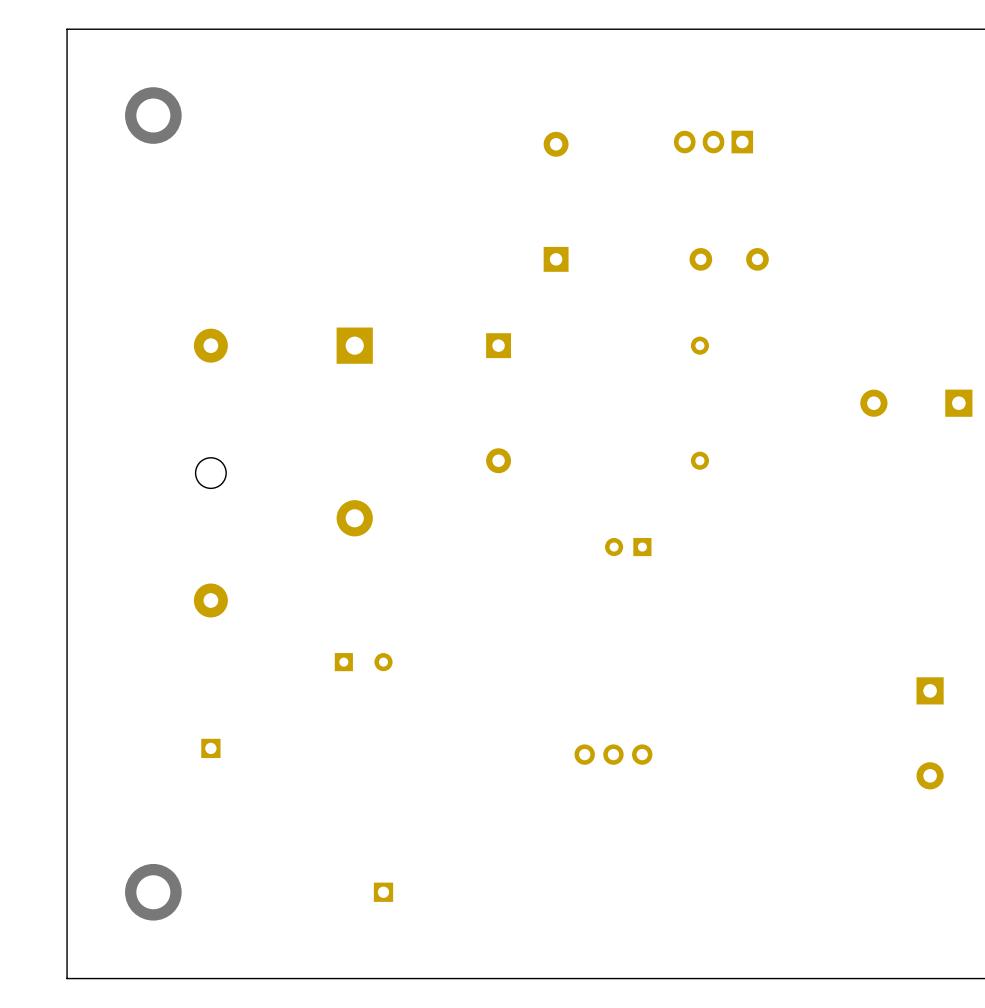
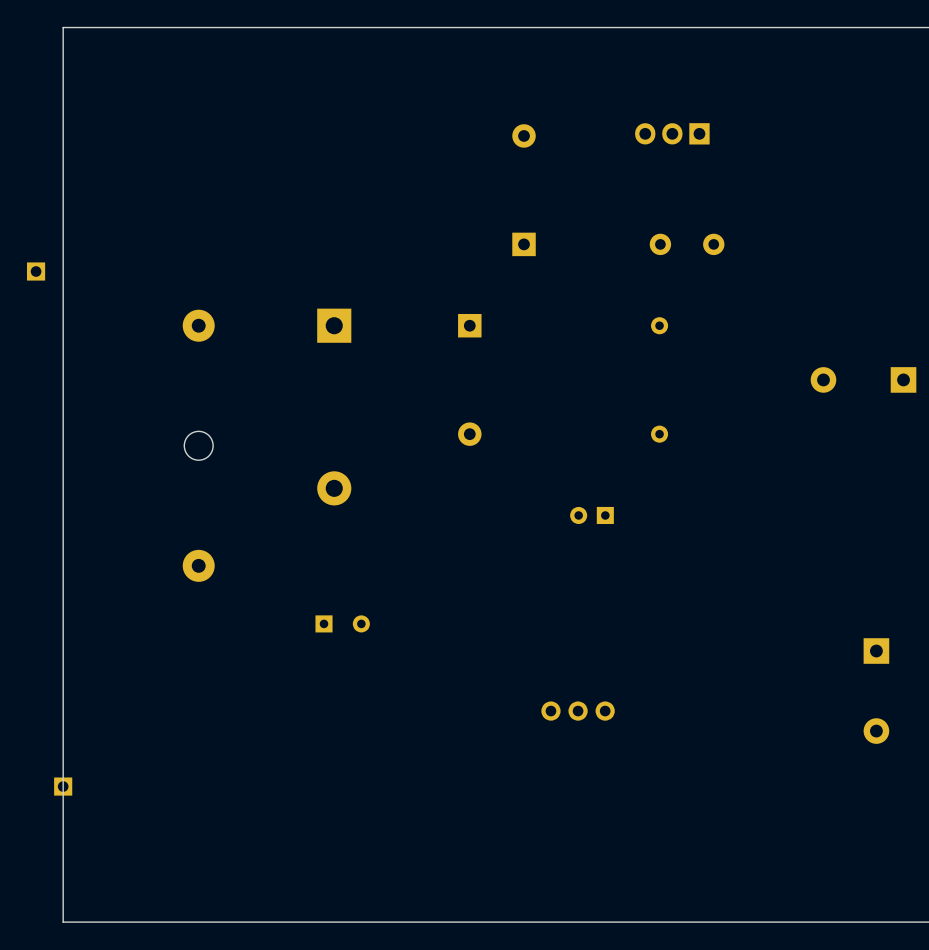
via: (153, 115) -> none
part: none -> (36, 271)
part: (210, 748) -> none
part: none -> (63, 786)
via: (153, 892) -> none
part: (383, 892) -> none

